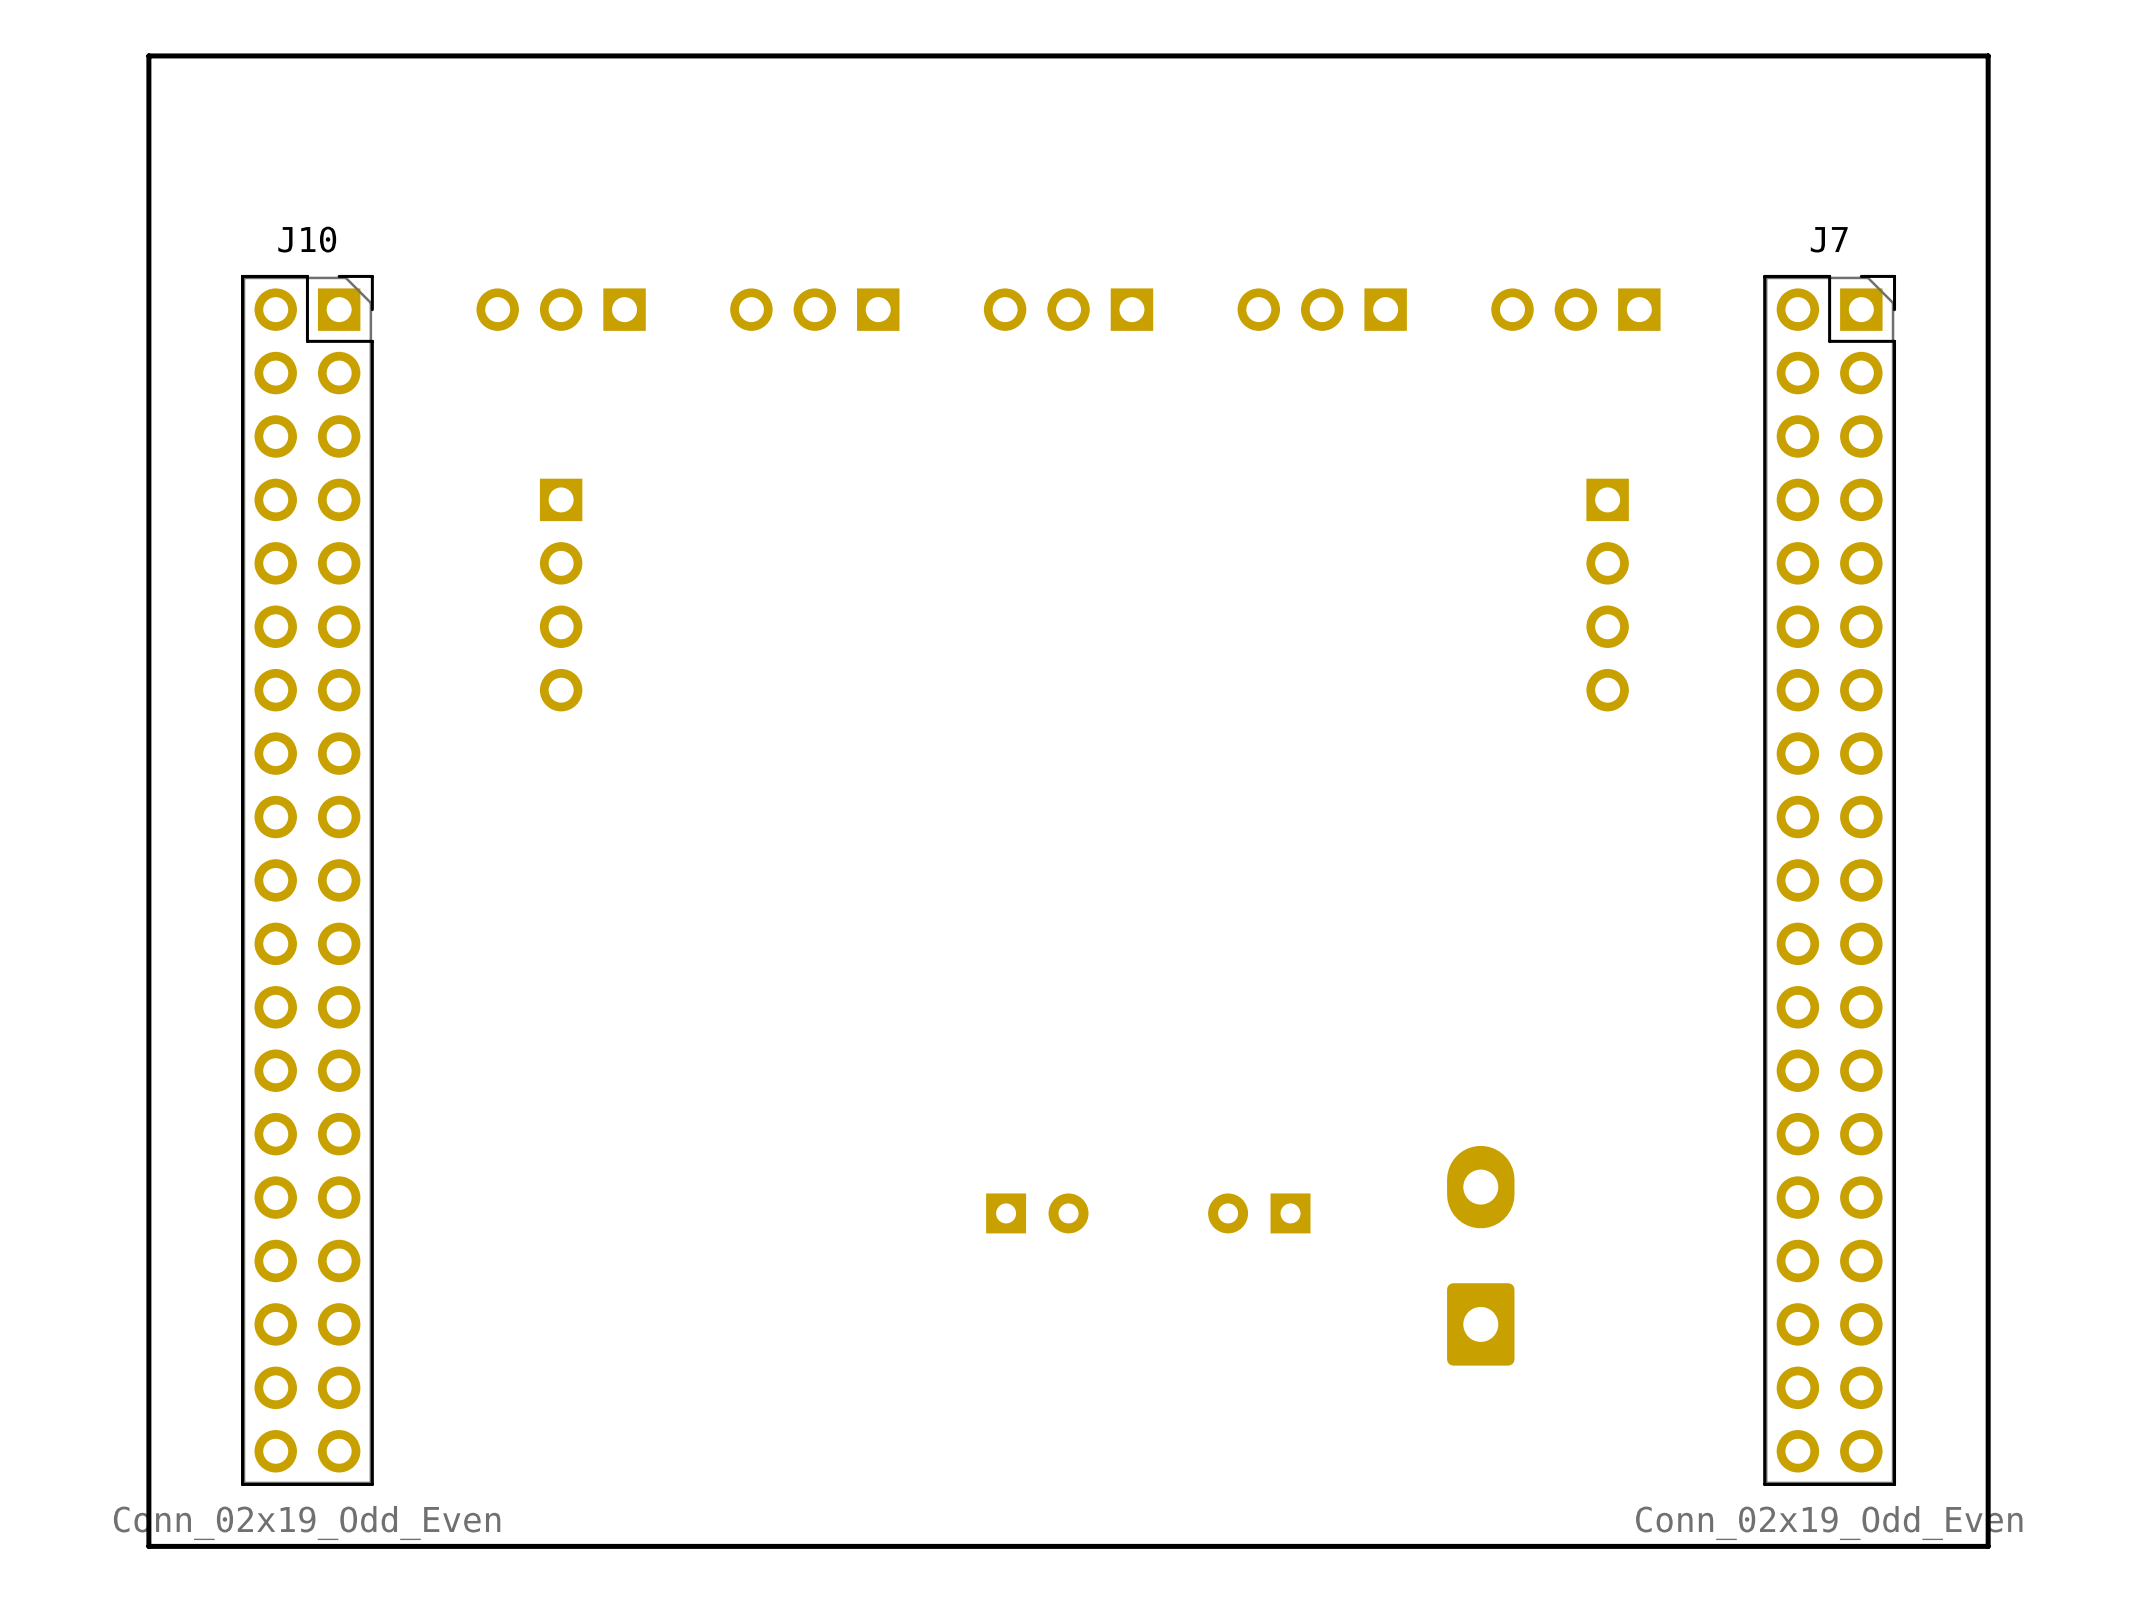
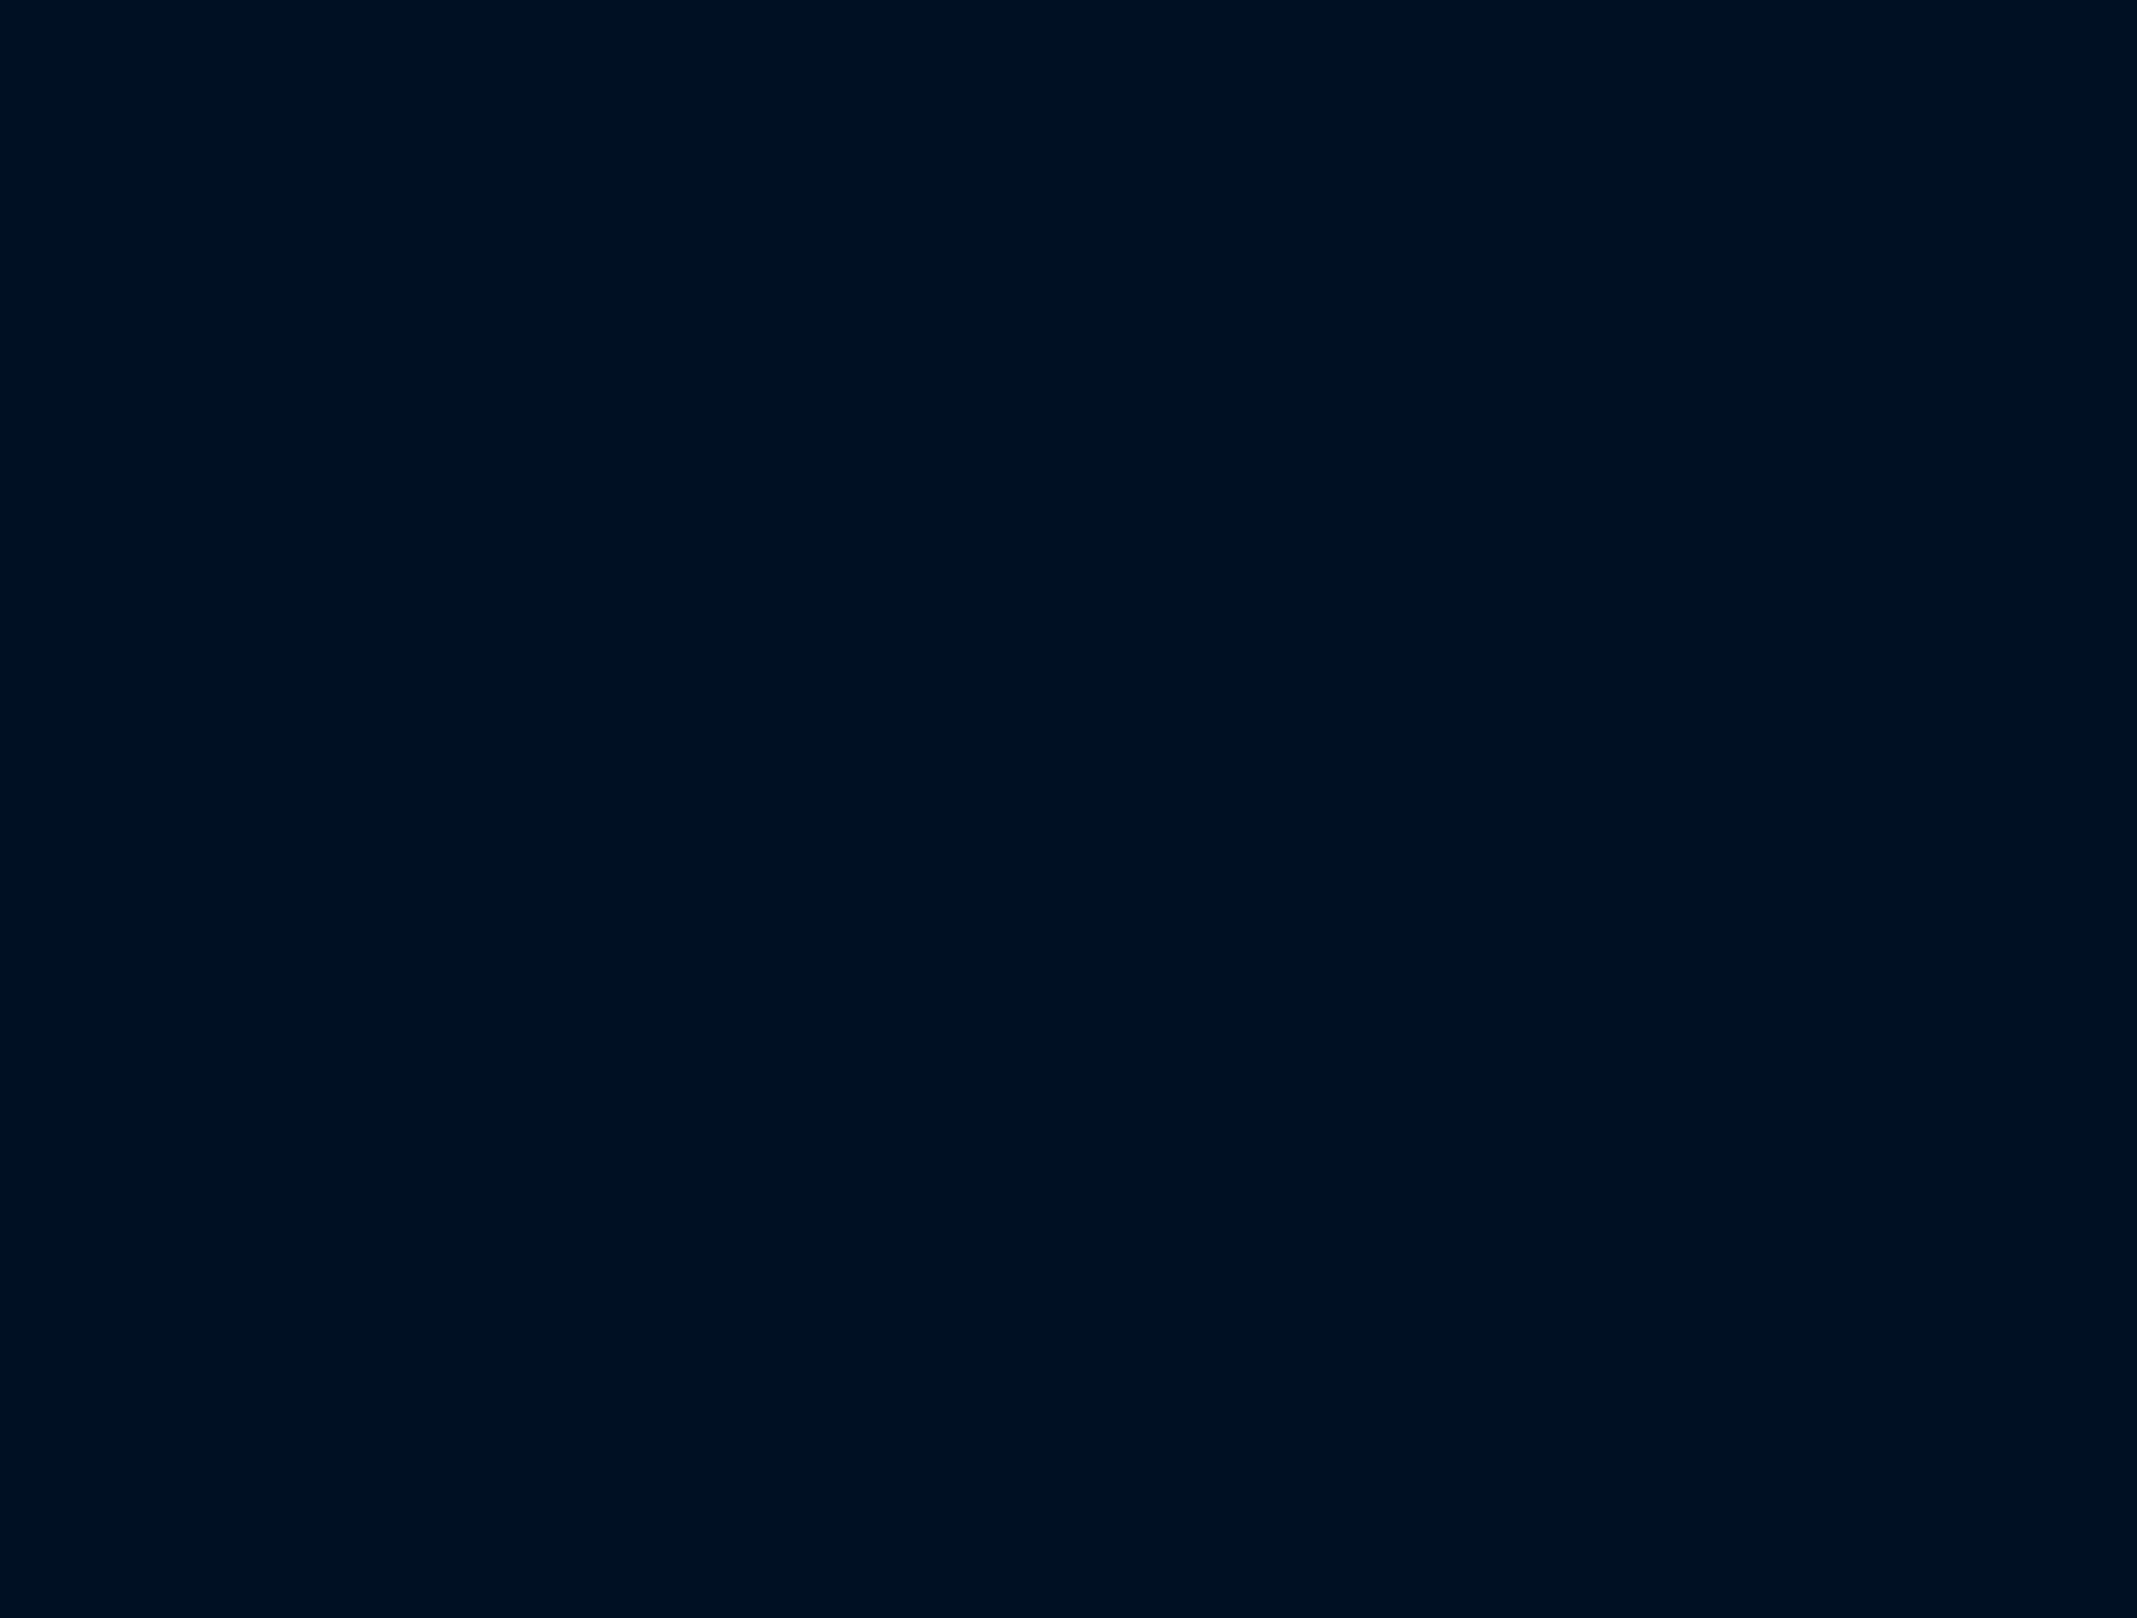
board edge: (1988, 55) (148, 55) (148, 1546) (1988, 1546) (1988, 55) -> none
part: (561, 309) -> none
part: (814, 309) -> none
part: (1068, 309) -> none
part: (1322, 309) -> none
part: (1575, 309) -> none
part: (561, 595) -> none
part: (1607, 595) -> none
J10: Conn_02x19_Odd_Even (307, 880) -> none
J7: Conn_02x19_Odd_Even (1829, 880) -> none
part: (1037, 1213) -> none
part: (1259, 1213) -> none
part: (1480, 1255) -> none

